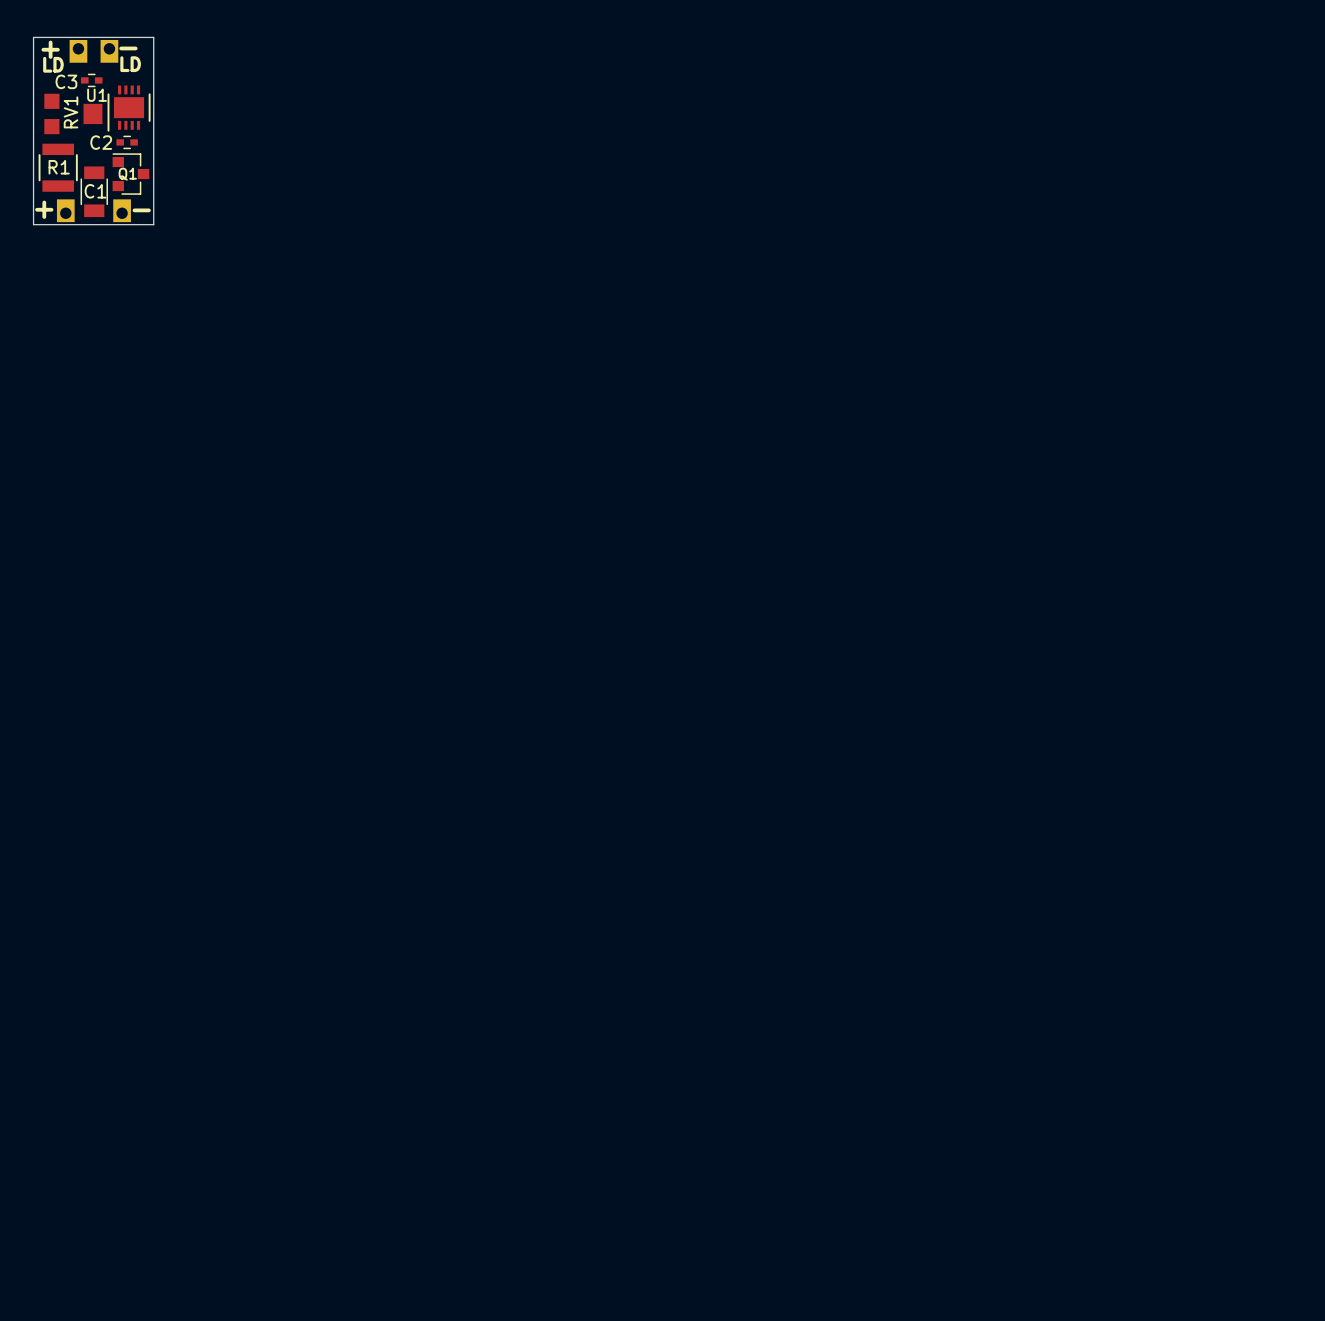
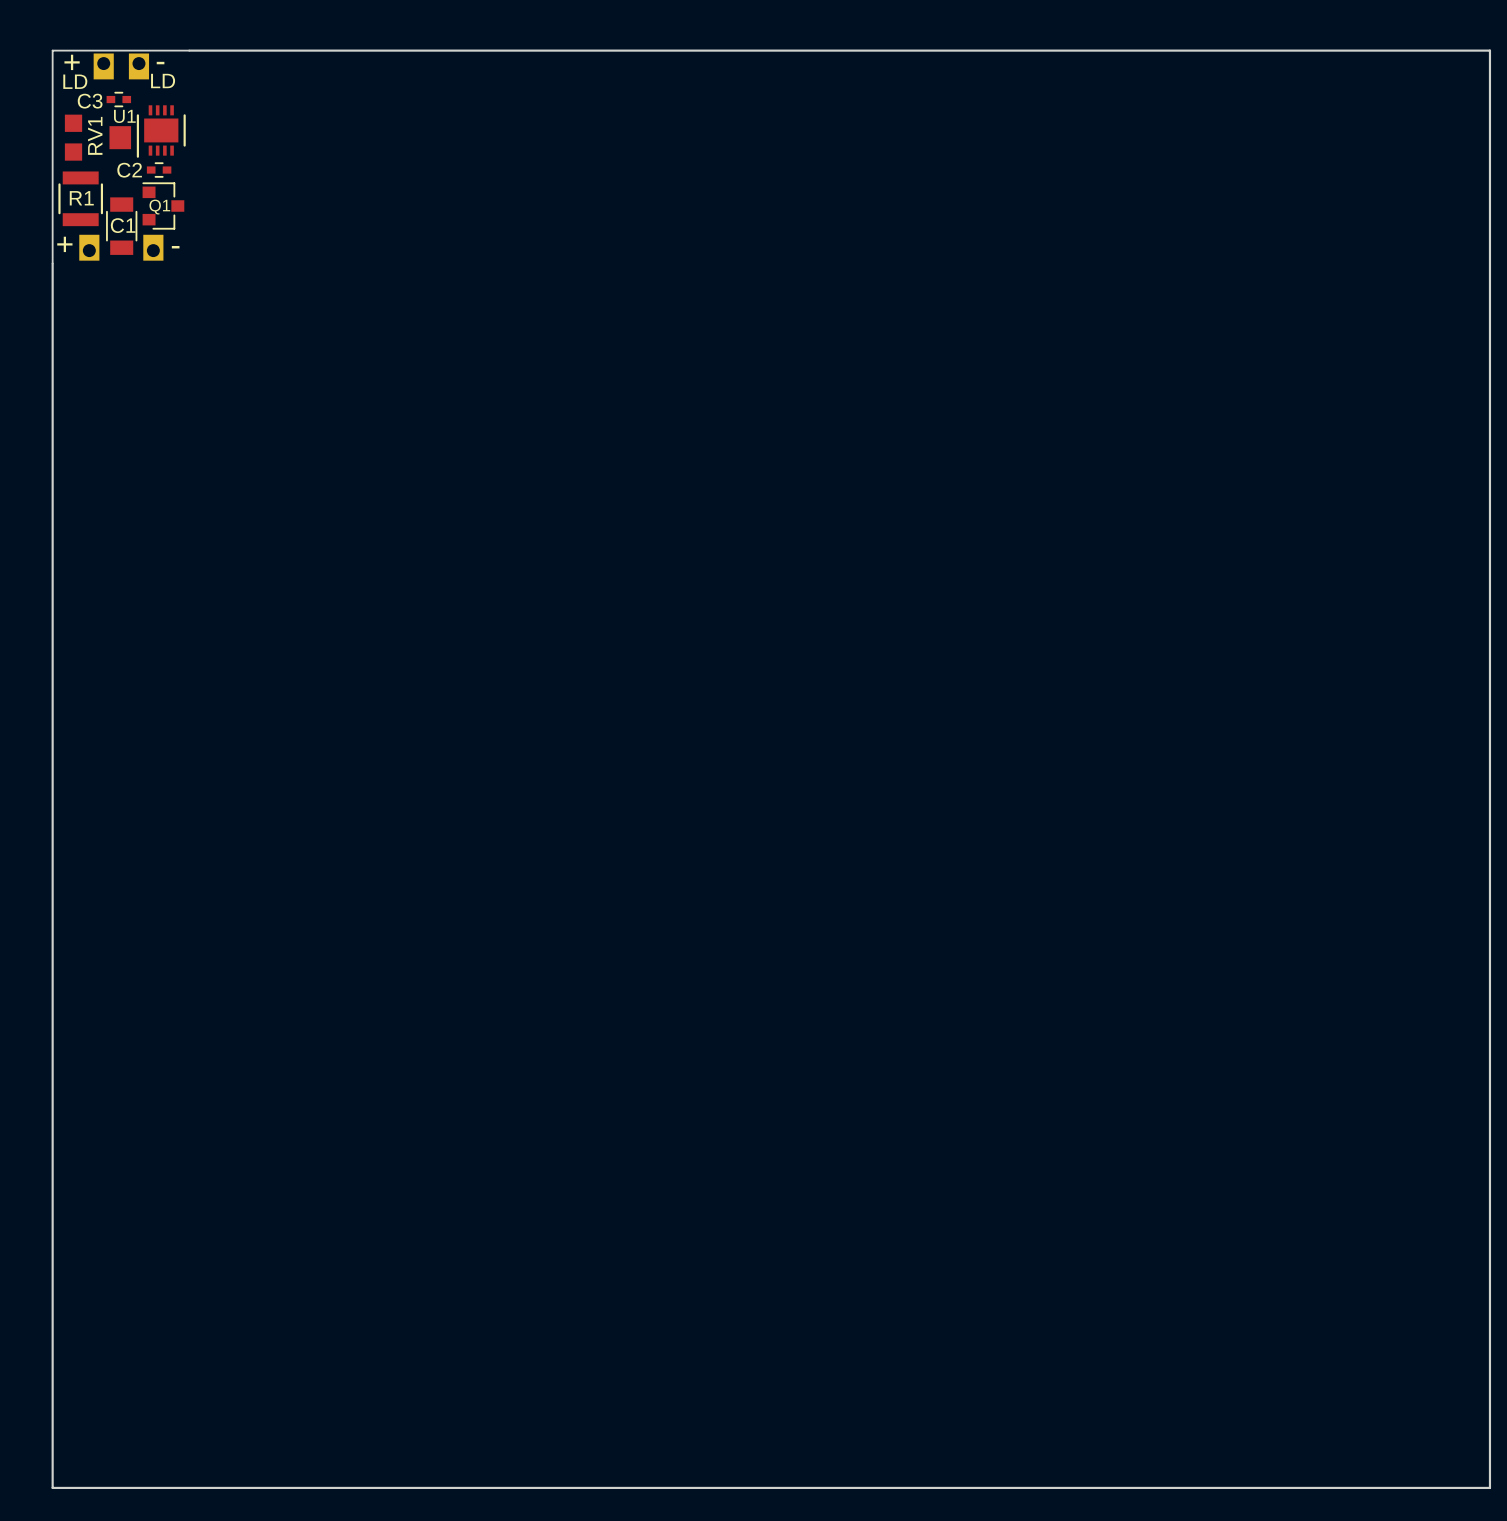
board edge: (153, 37) (153, 224) (33, 224) -> (189, 50) (1489, 50) (1489, 1487) (52, 1487) (52, 263)

